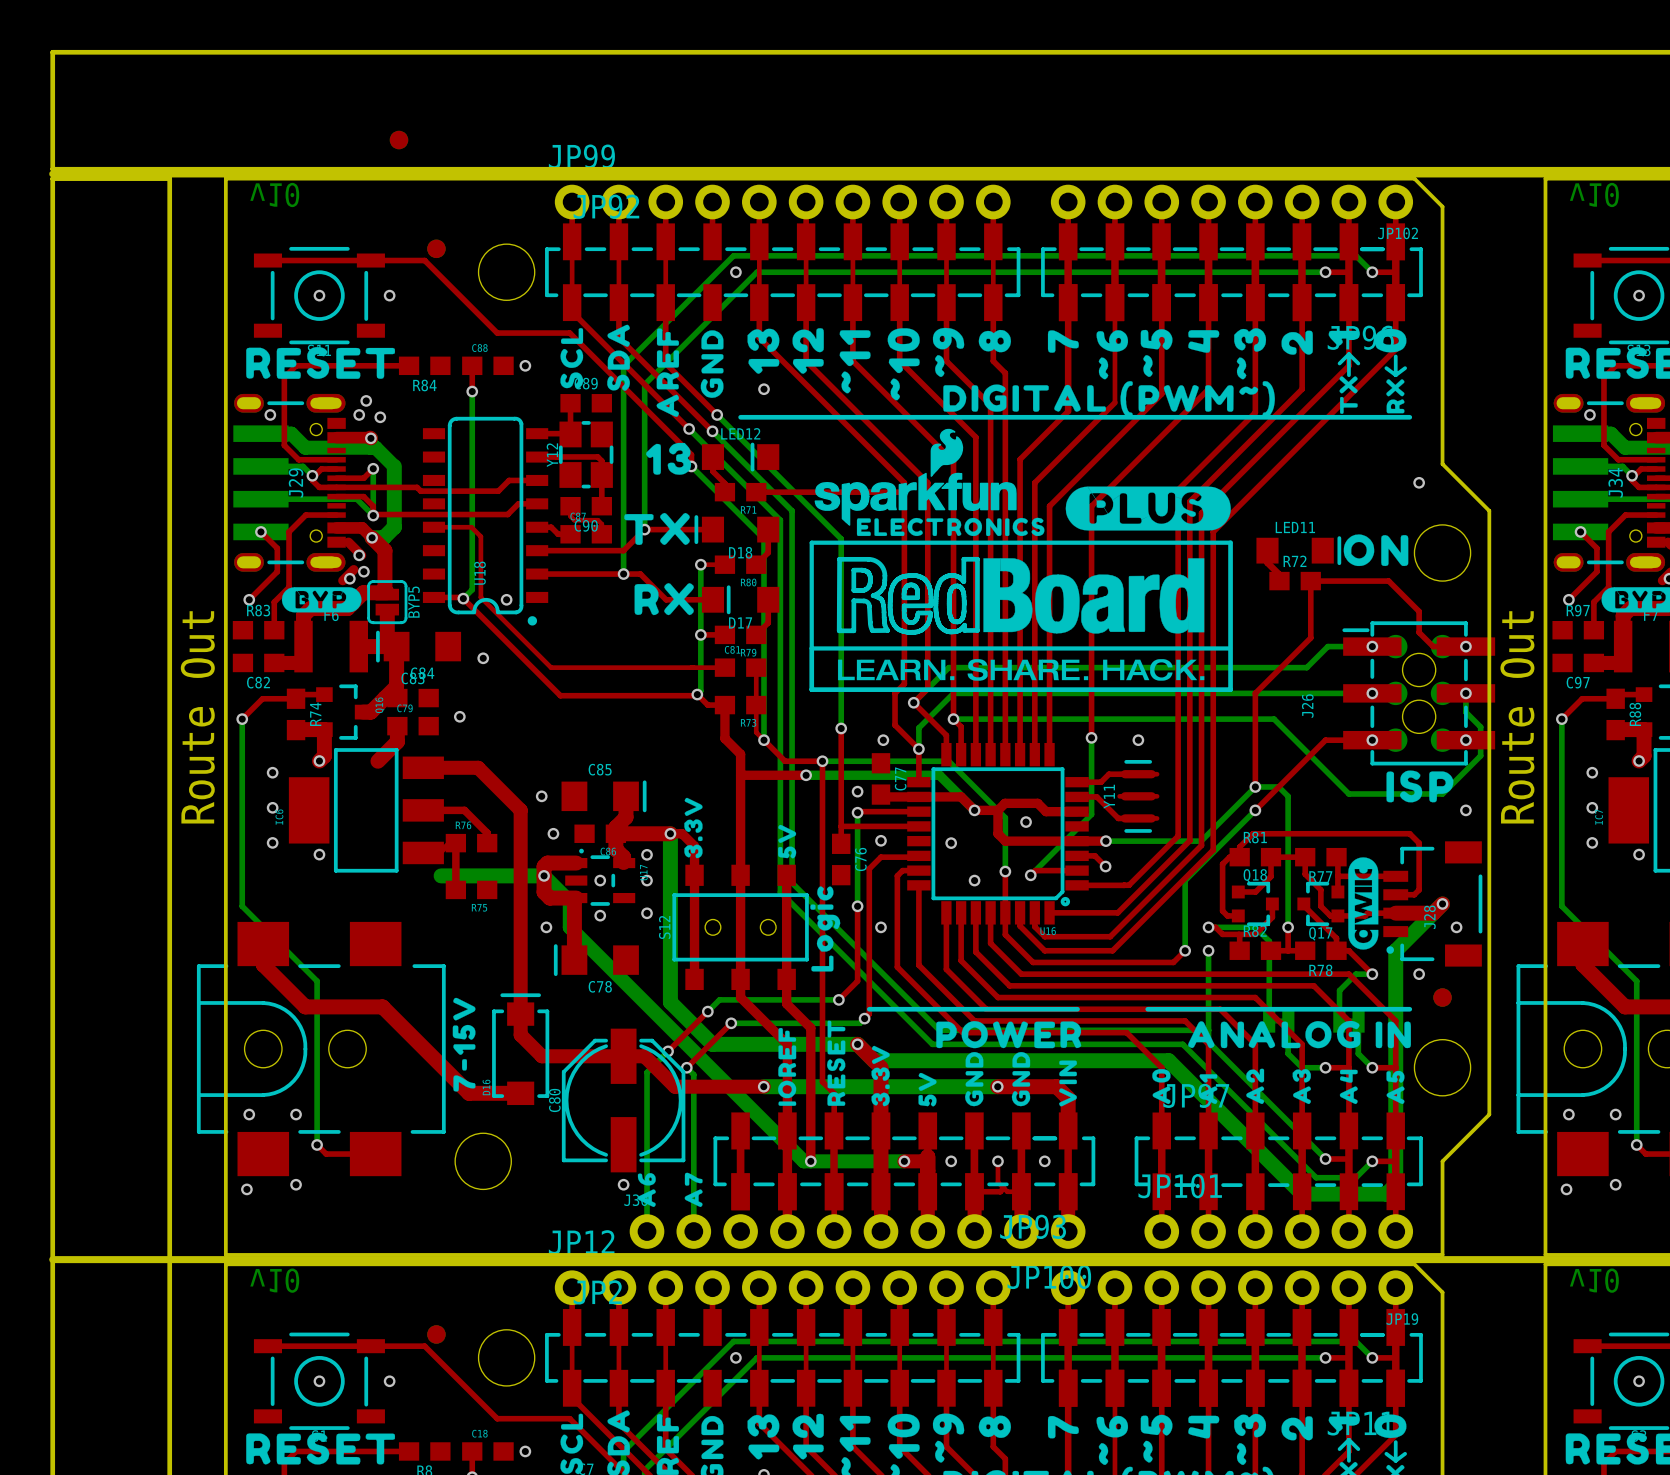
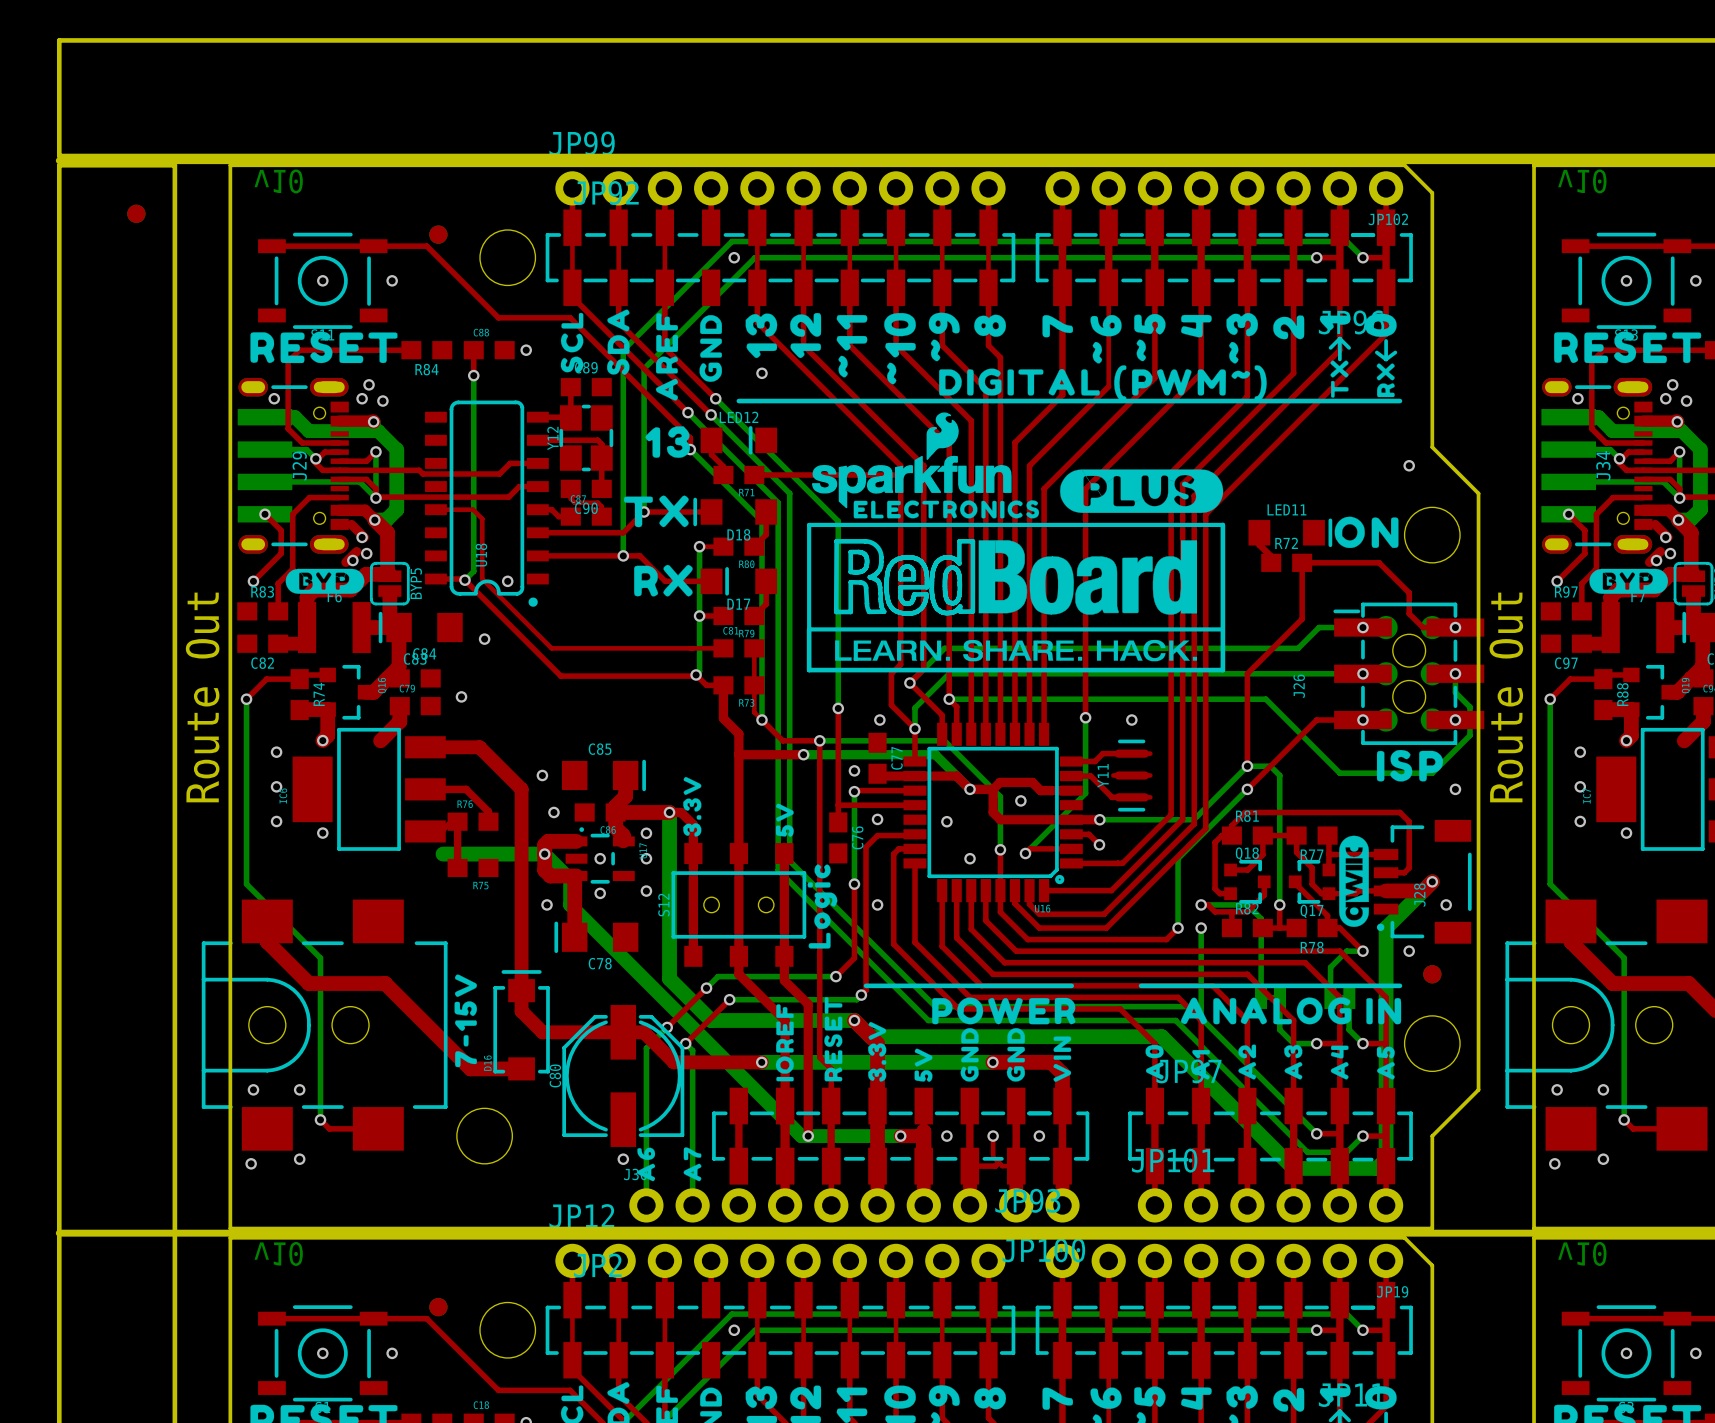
part position: (399, 140) -> (136, 213)

